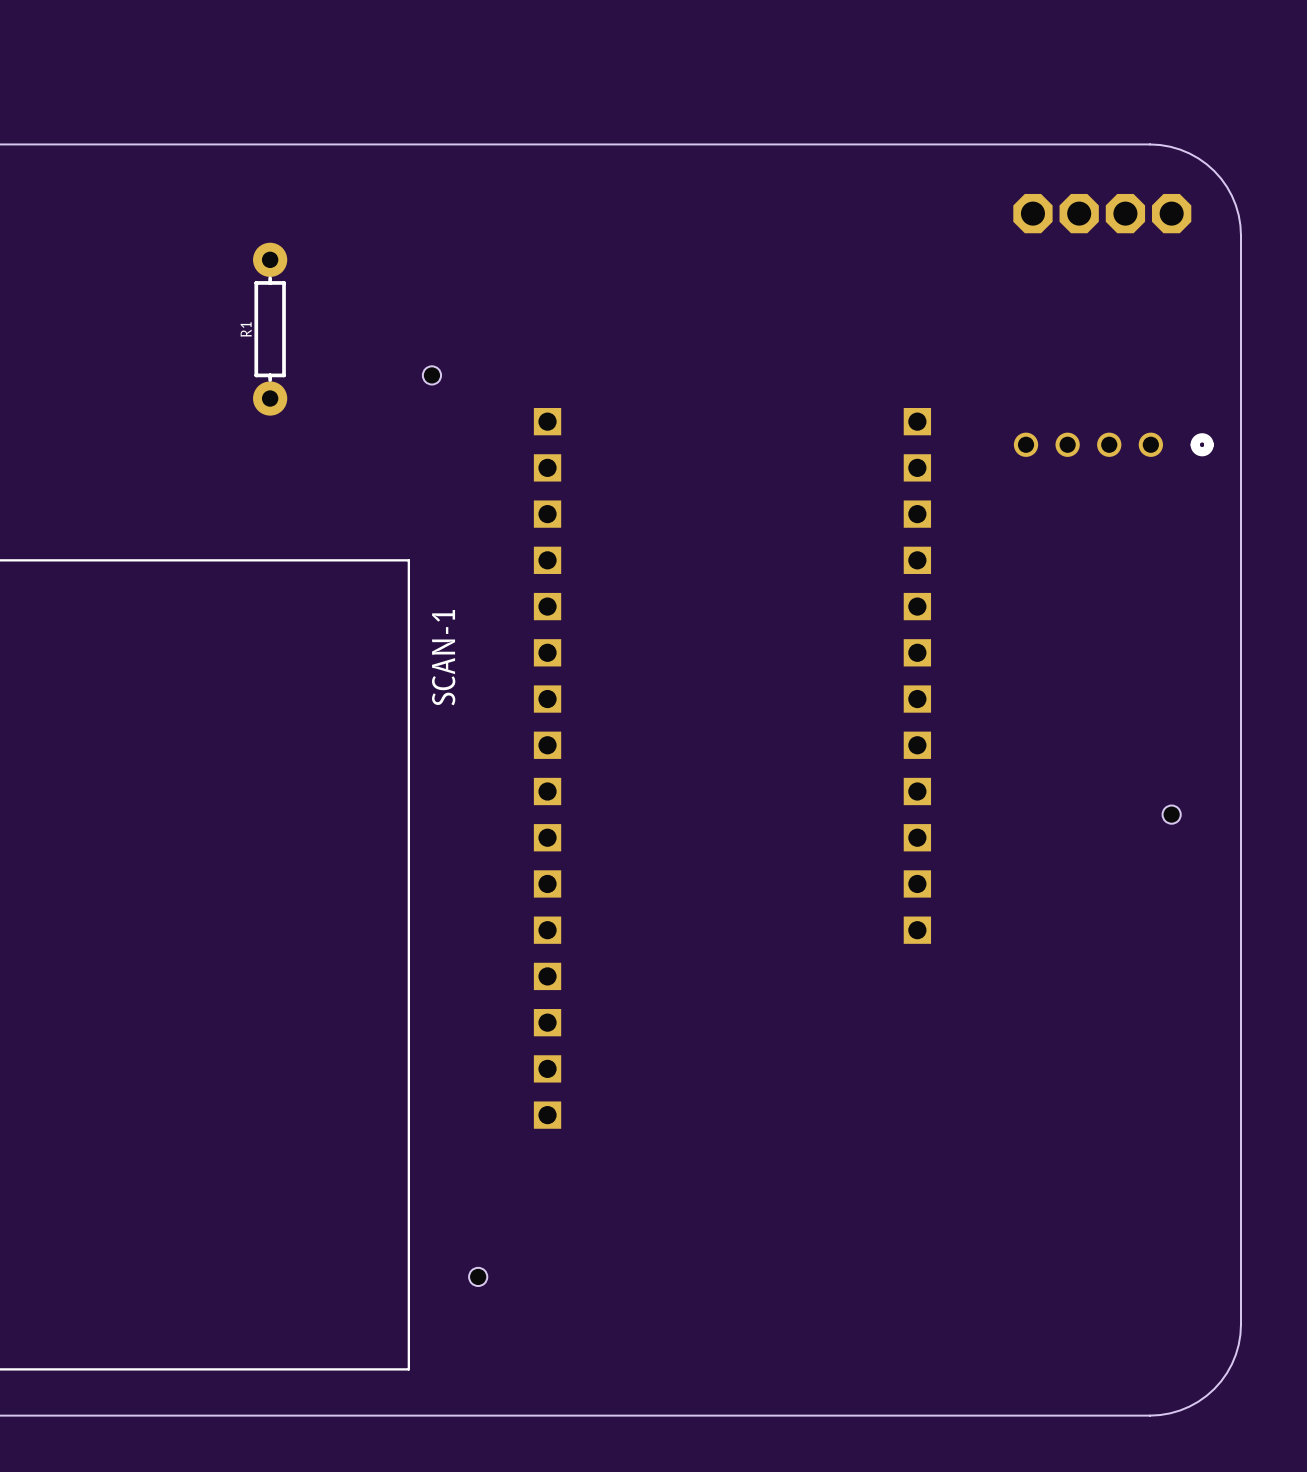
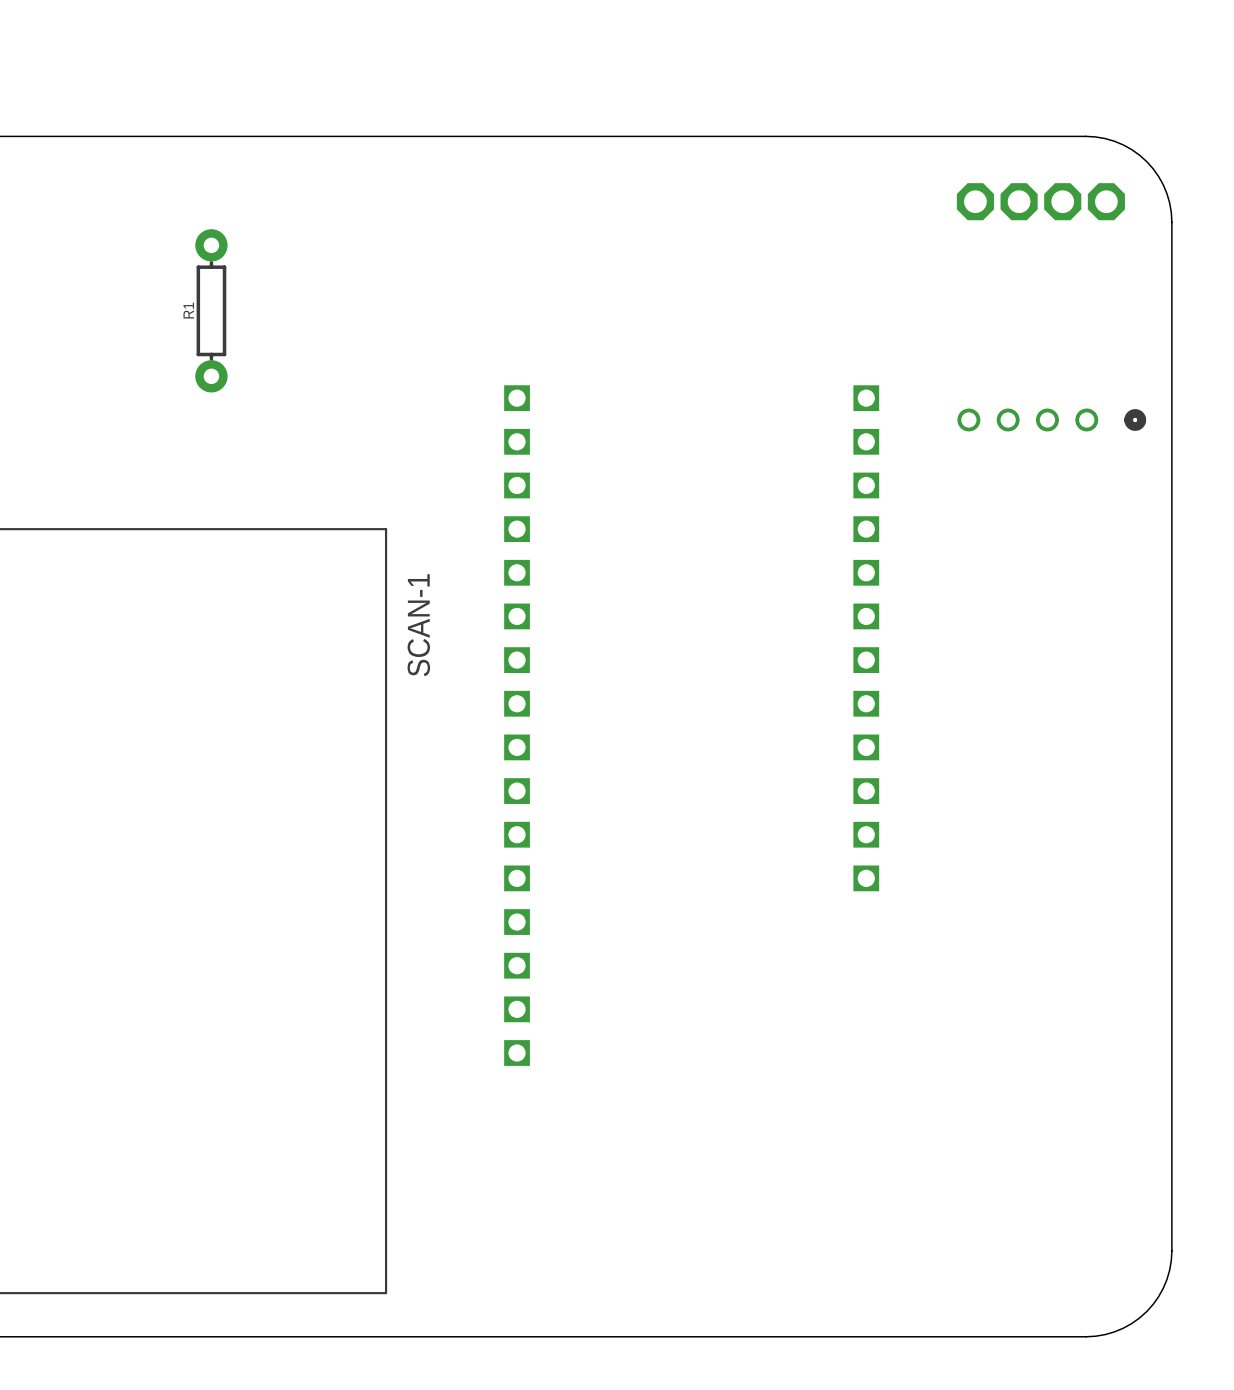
R1 position: (270, 329) -> (211, 310)
hole: (431, 375) -> none
hole: (1171, 814) -> none
hole: (478, 1276) -> none

